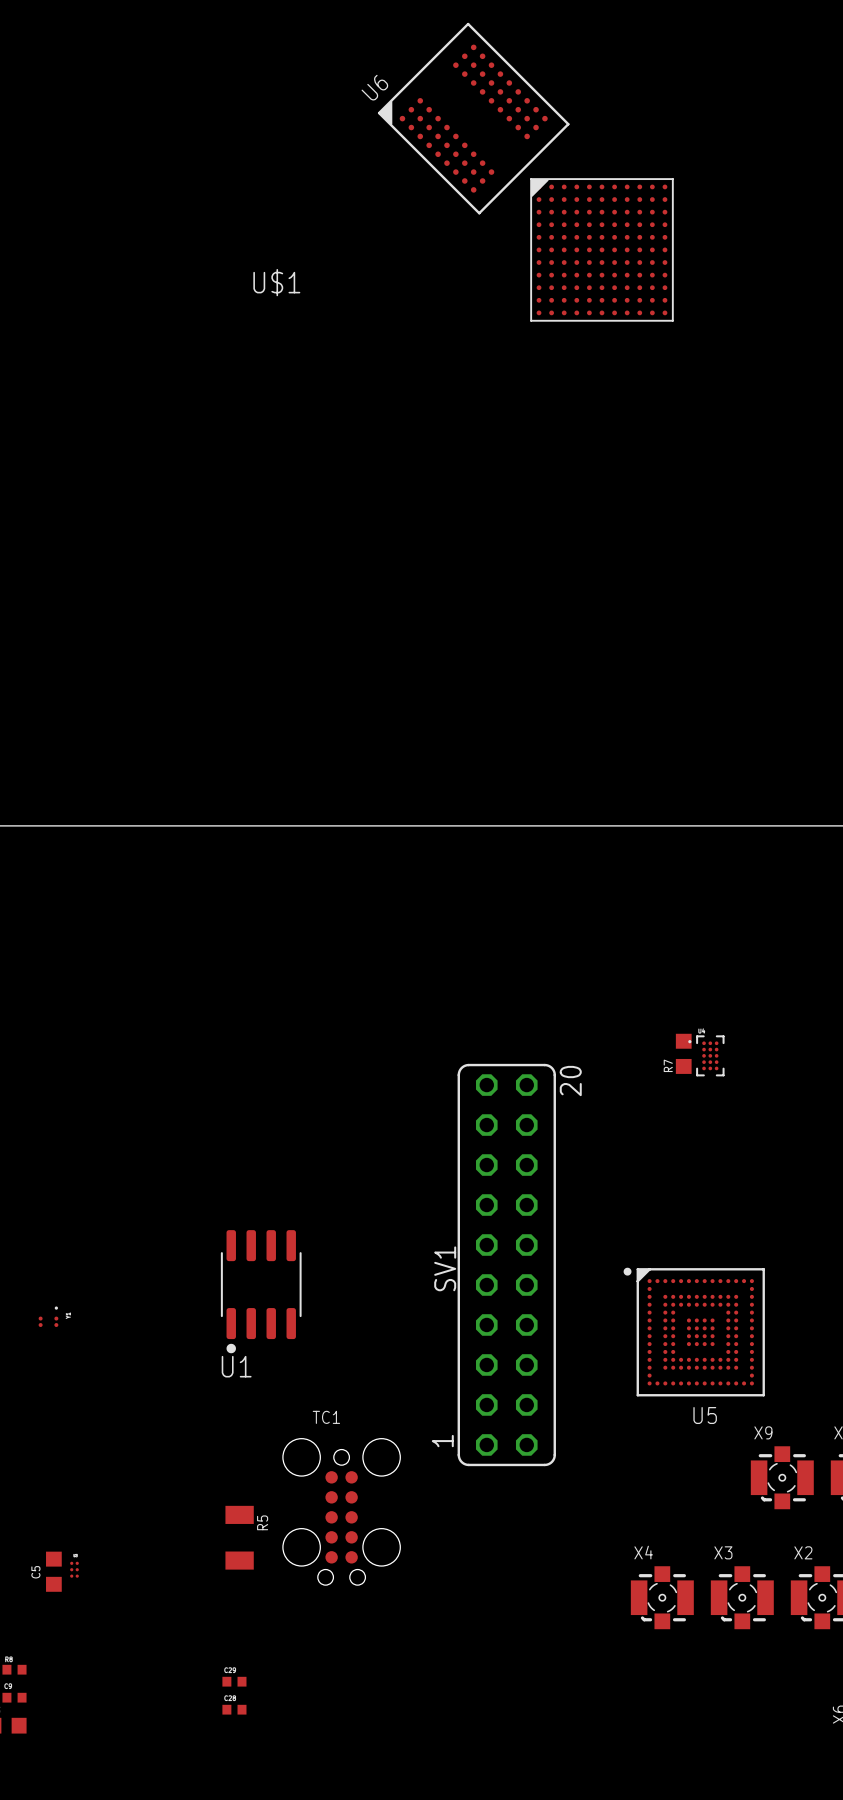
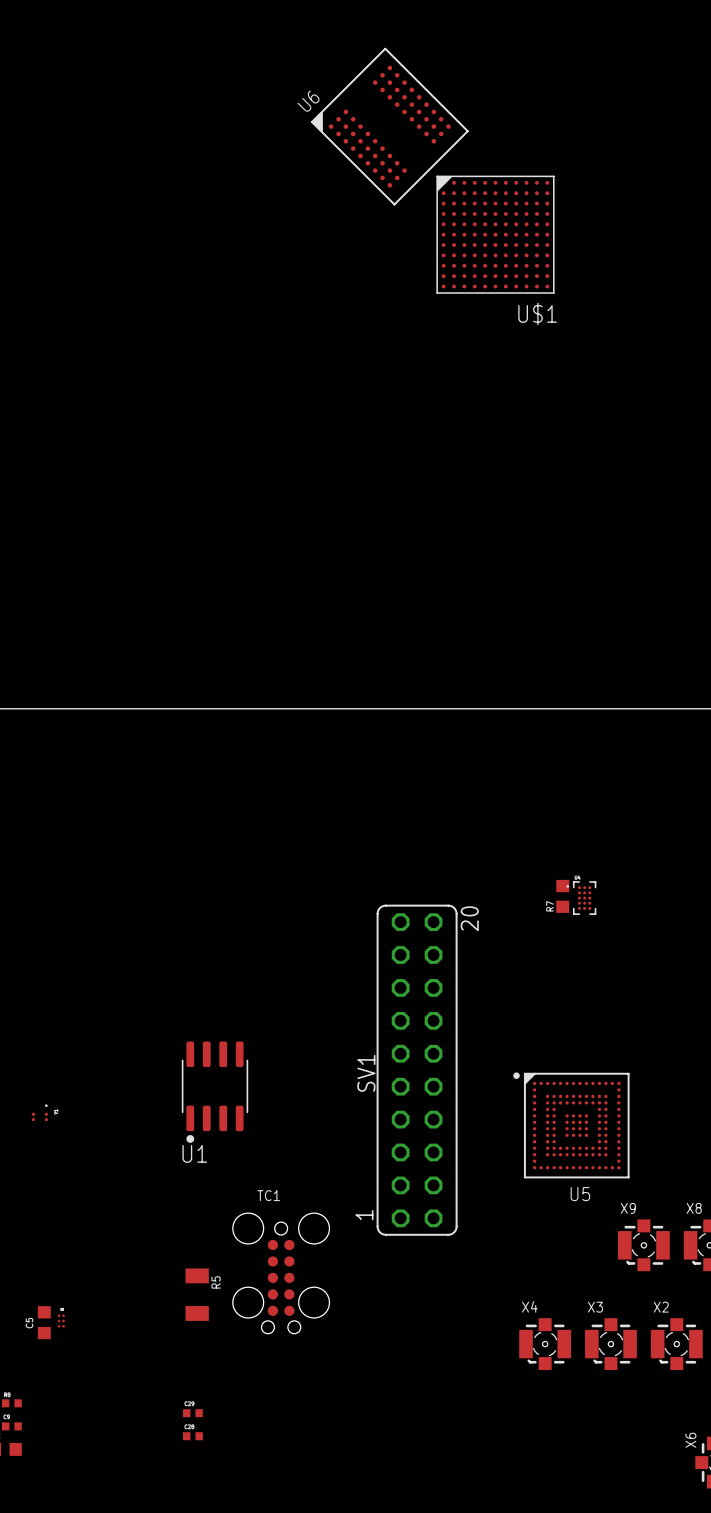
U$1 name position: U$1 (276, 282) -> U$1 (537, 313)

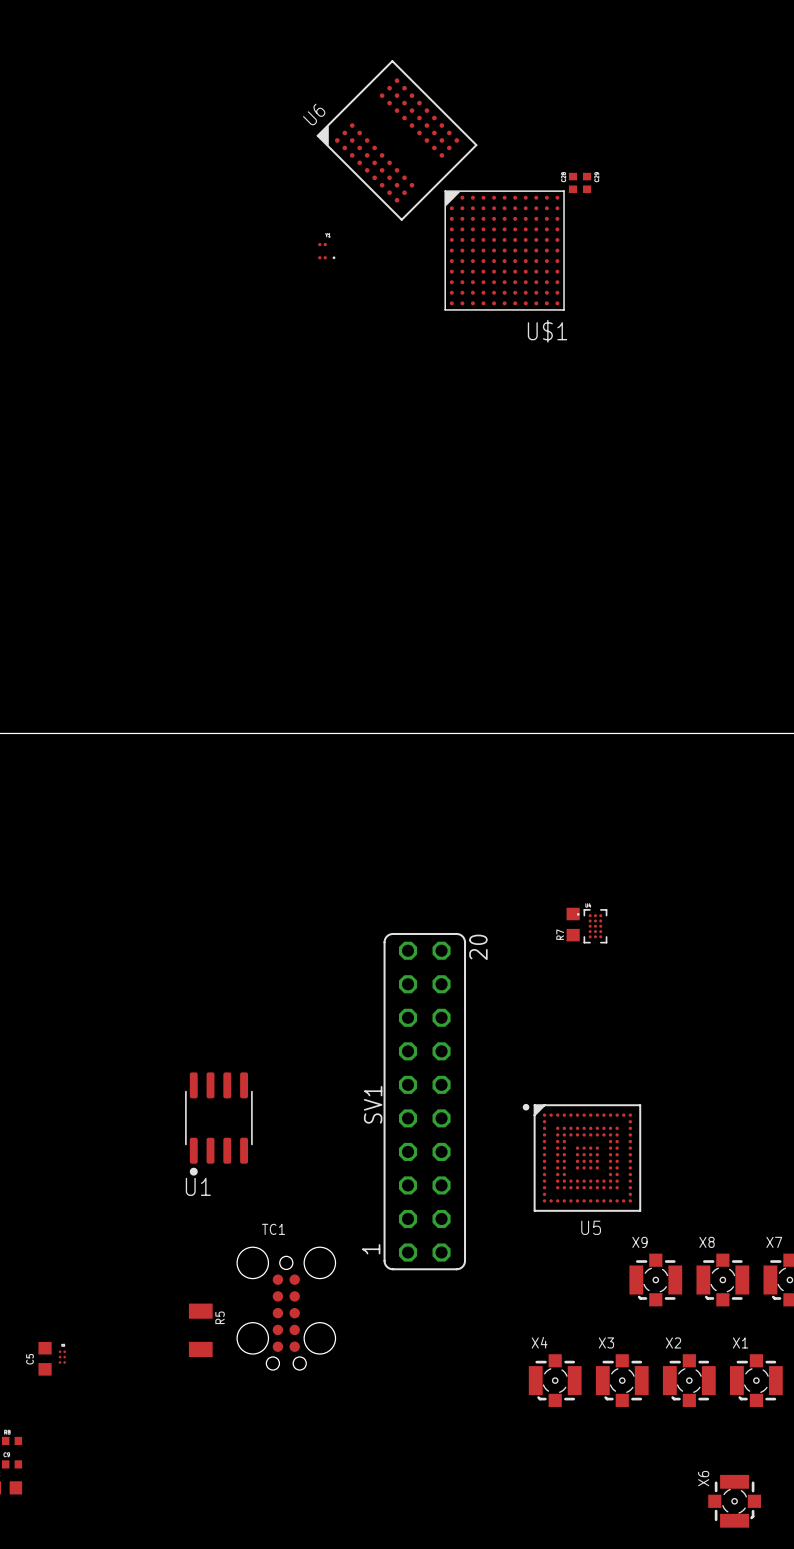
part rotation: 0° (39, 1112) -> 90° clockwise (326, 251)
part position: (39, 1112) -> (326, 251)
part rotation: 0° (192, 1413) -> 90° clockwise (587, 182)
part position: (192, 1413) -> (587, 182)
part rotation: 0° (192, 1436) -> 90° clockwise (572, 182)
part position: (192, 1436) -> (572, 182)

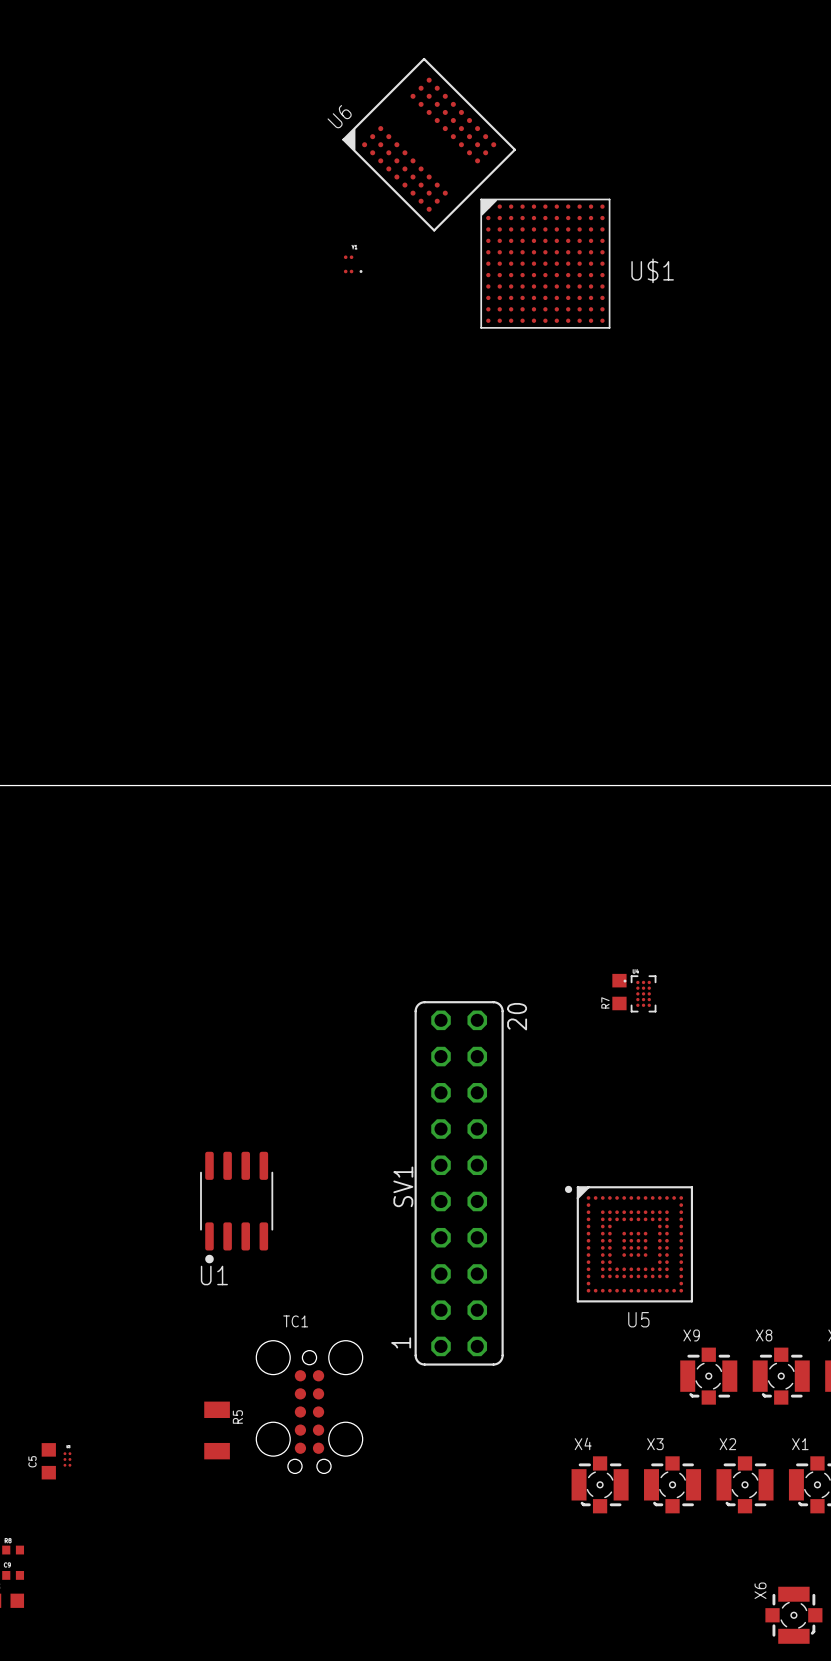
part: (572, 182) -> none
part: (587, 182) -> none
U$1 name position: U$1 (547, 331) -> U$1 (652, 270)

